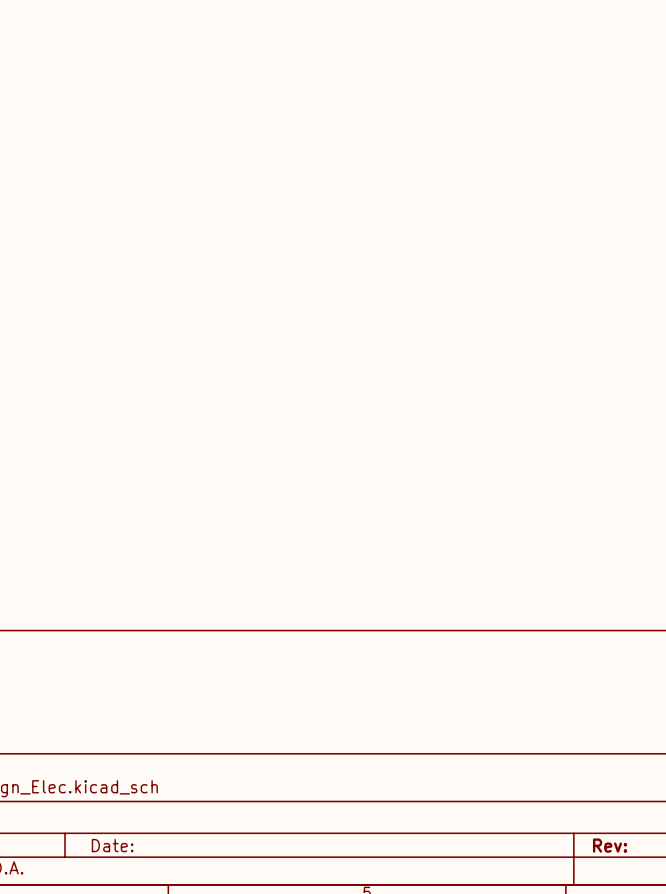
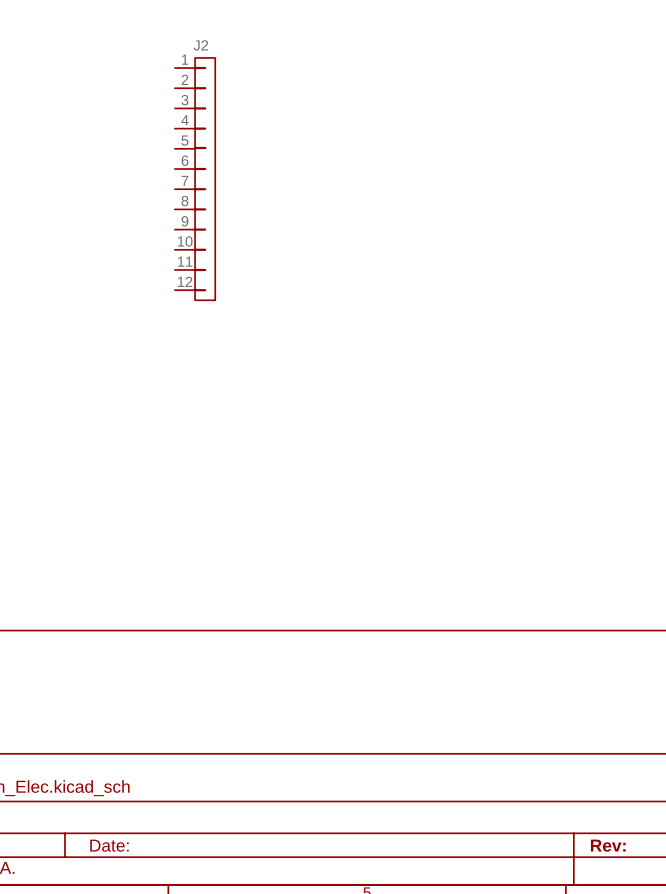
J2: none -> (195, 179)

